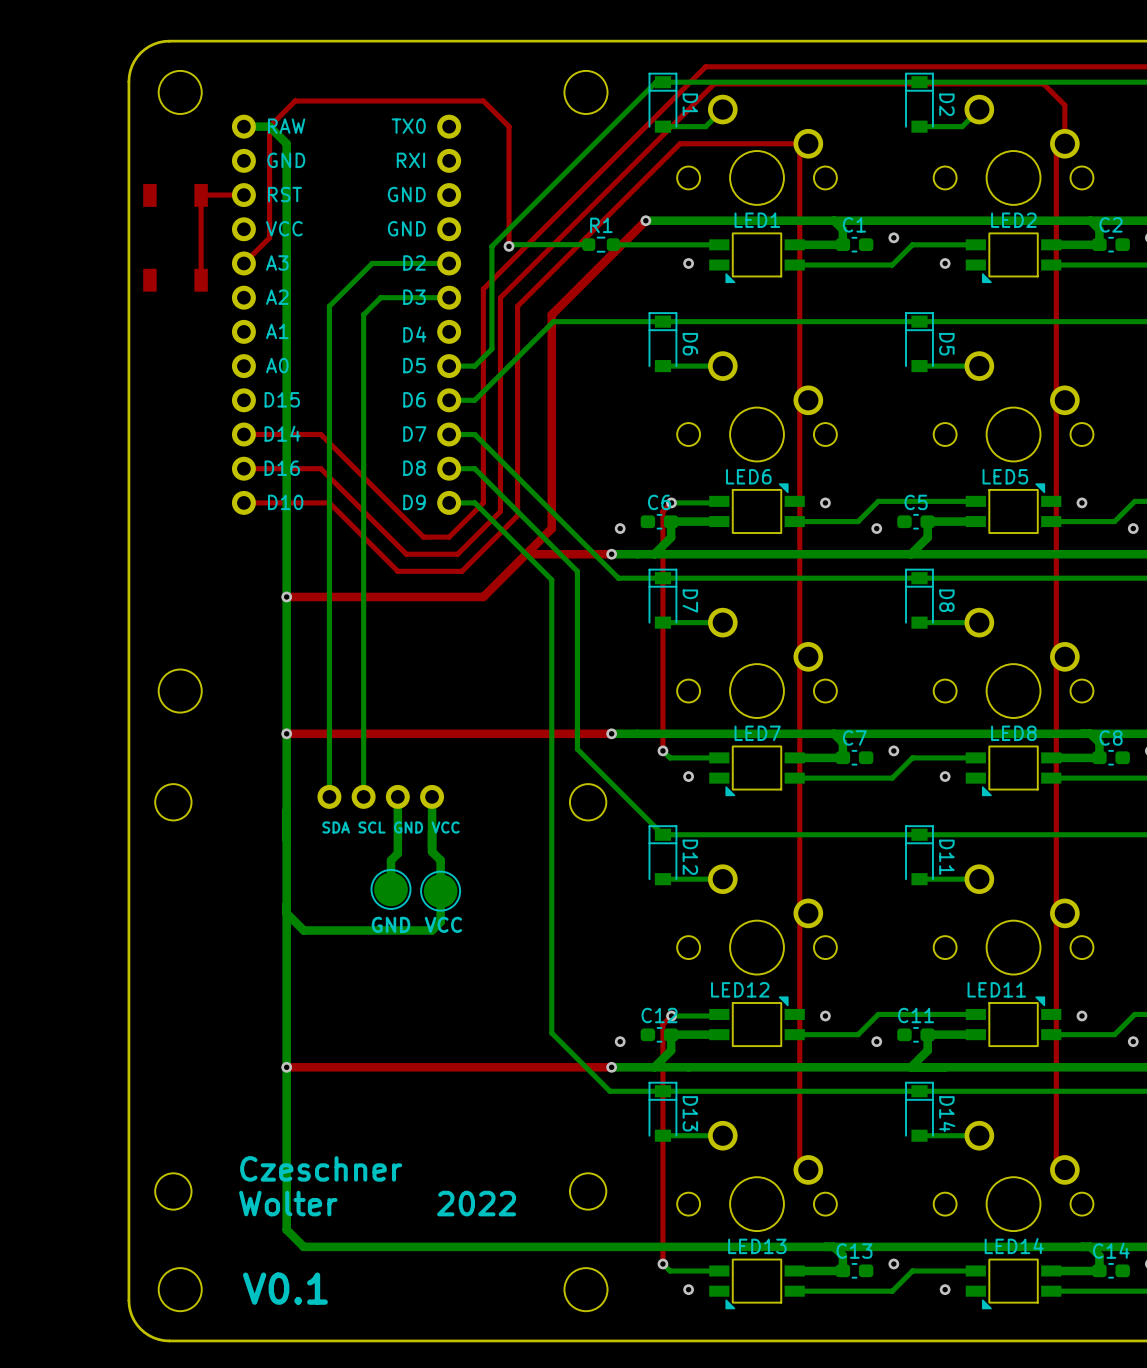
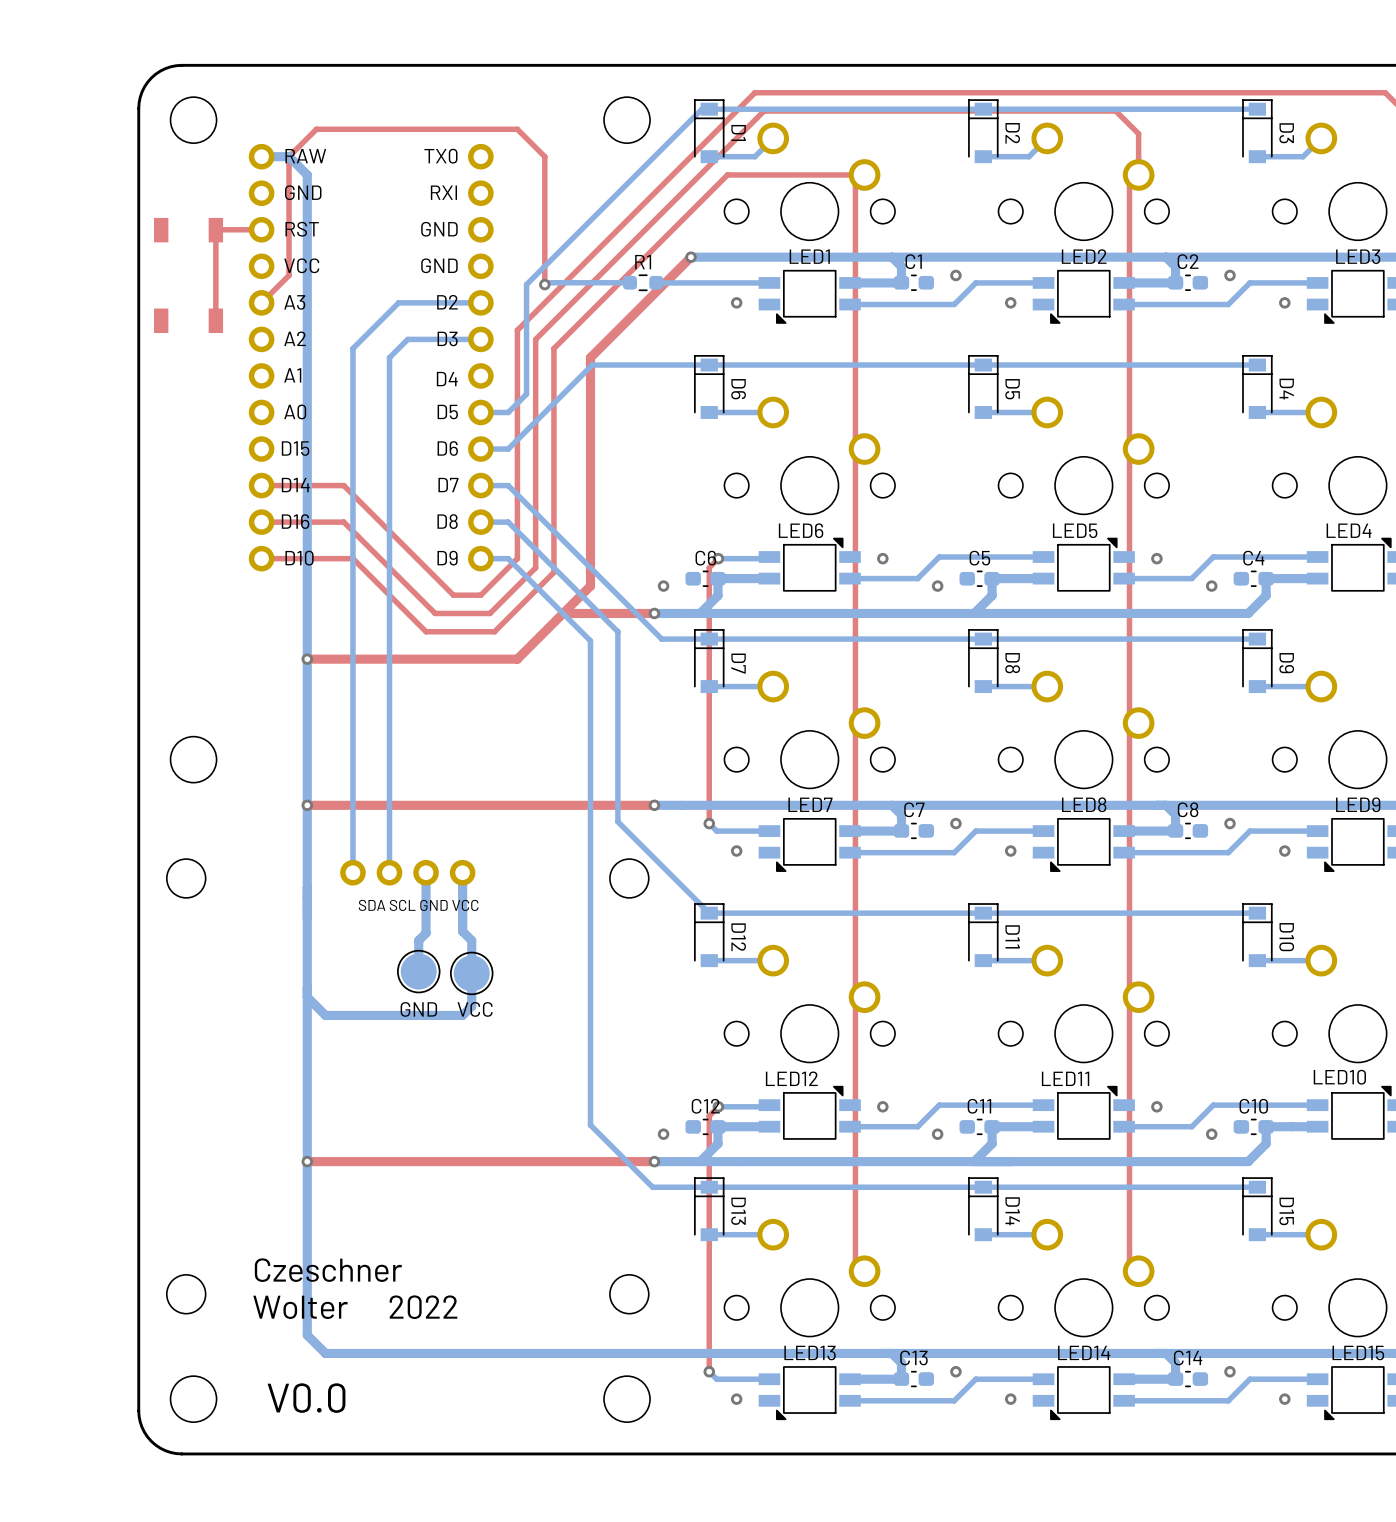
text: V0.1 (285, 1288) -> V0.0 (306, 1398)

